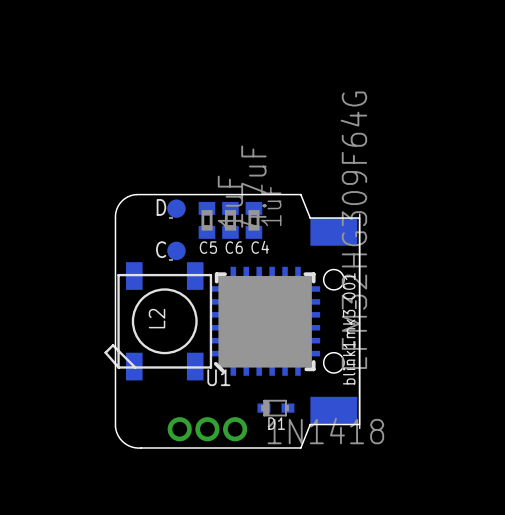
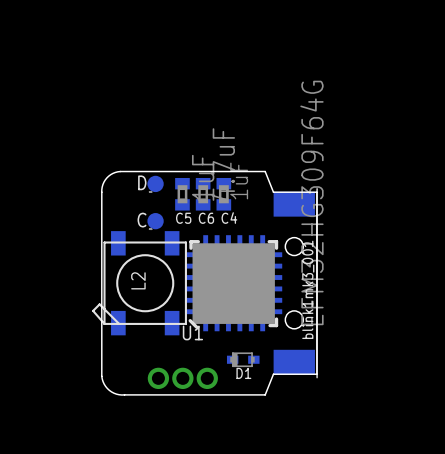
D1 value: 1N1418 (325, 431) -> none

